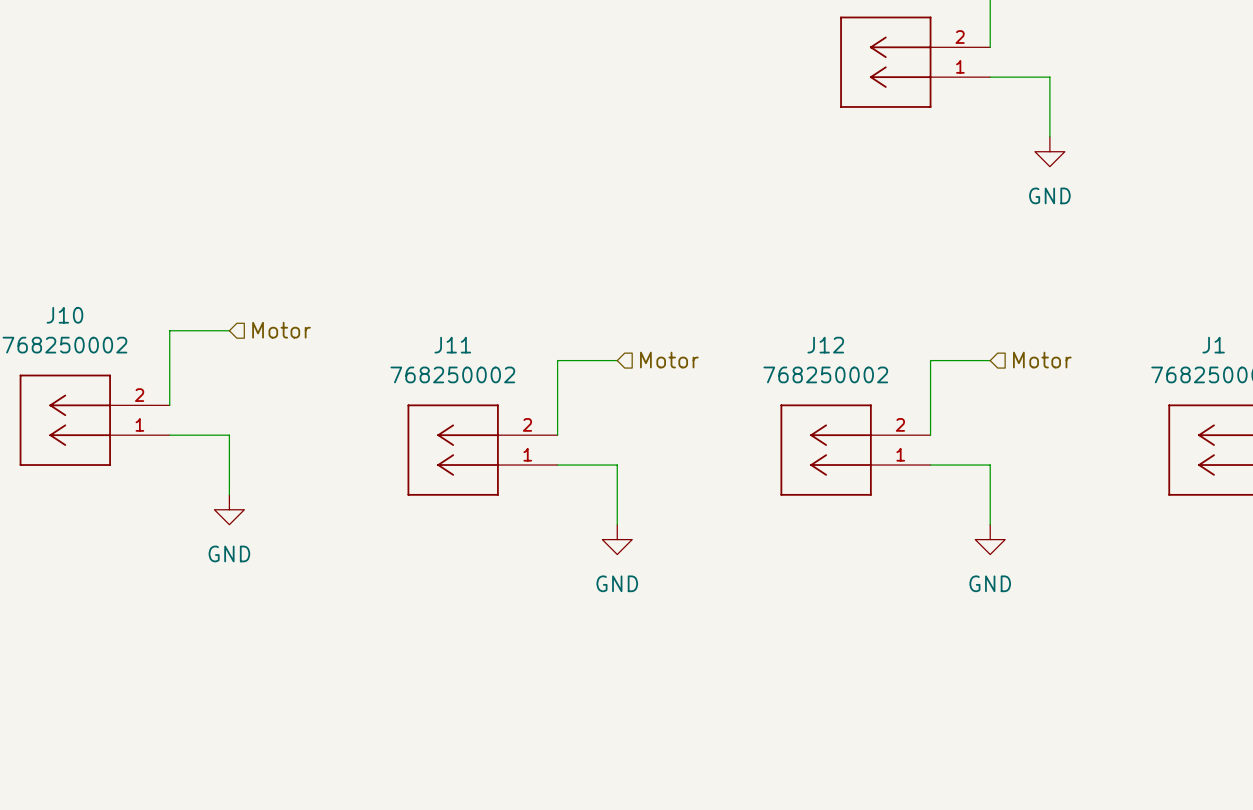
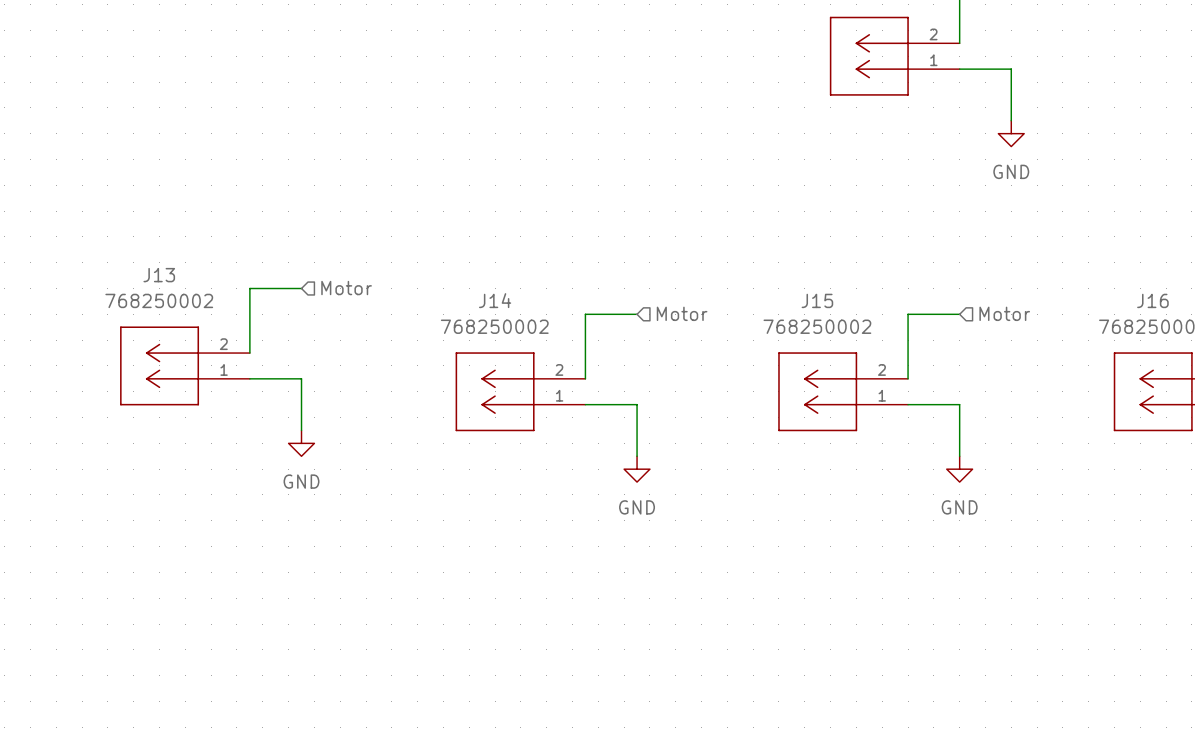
J10 name: J10 (64, 315) -> J13 (159, 275)
J11 name: J11 (452, 345) -> J14 (495, 300)
J12 name: J12 (825, 345) -> J15 (817, 300)
J1 name: J1 (1213, 345) -> J16 (1152, 300)

